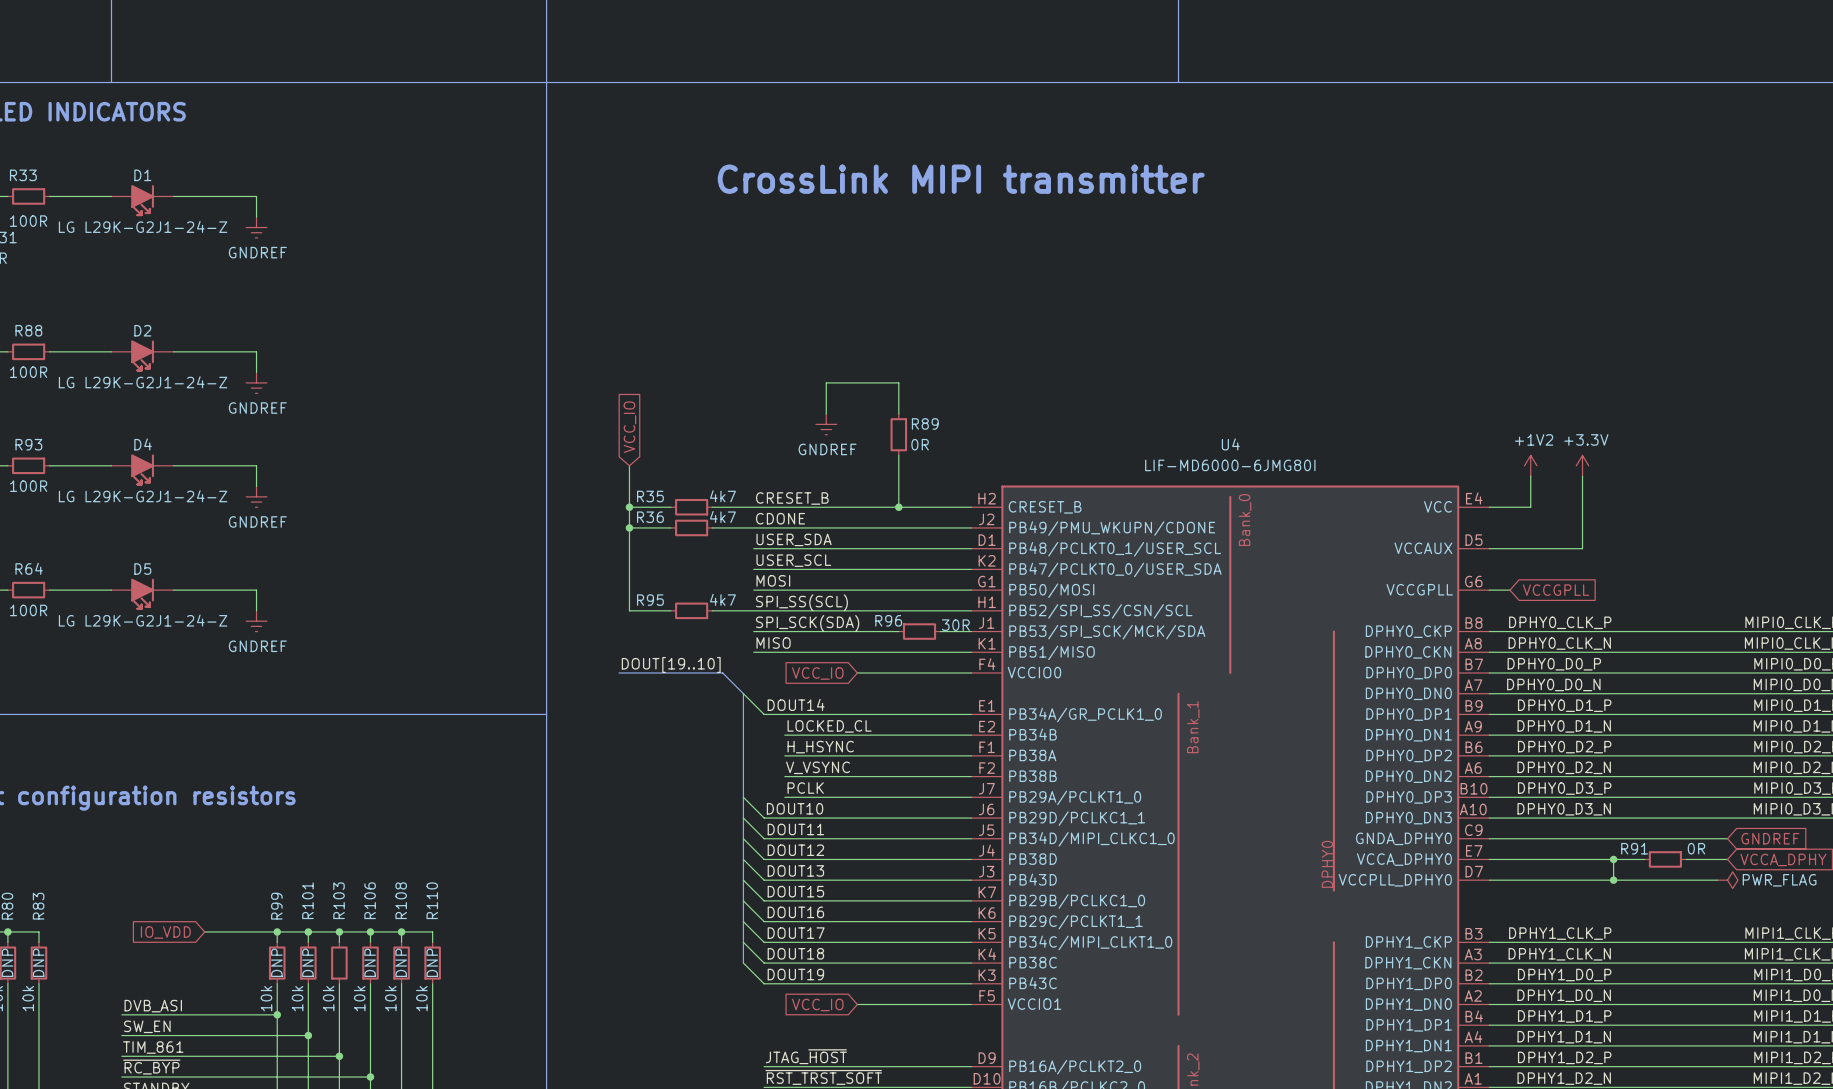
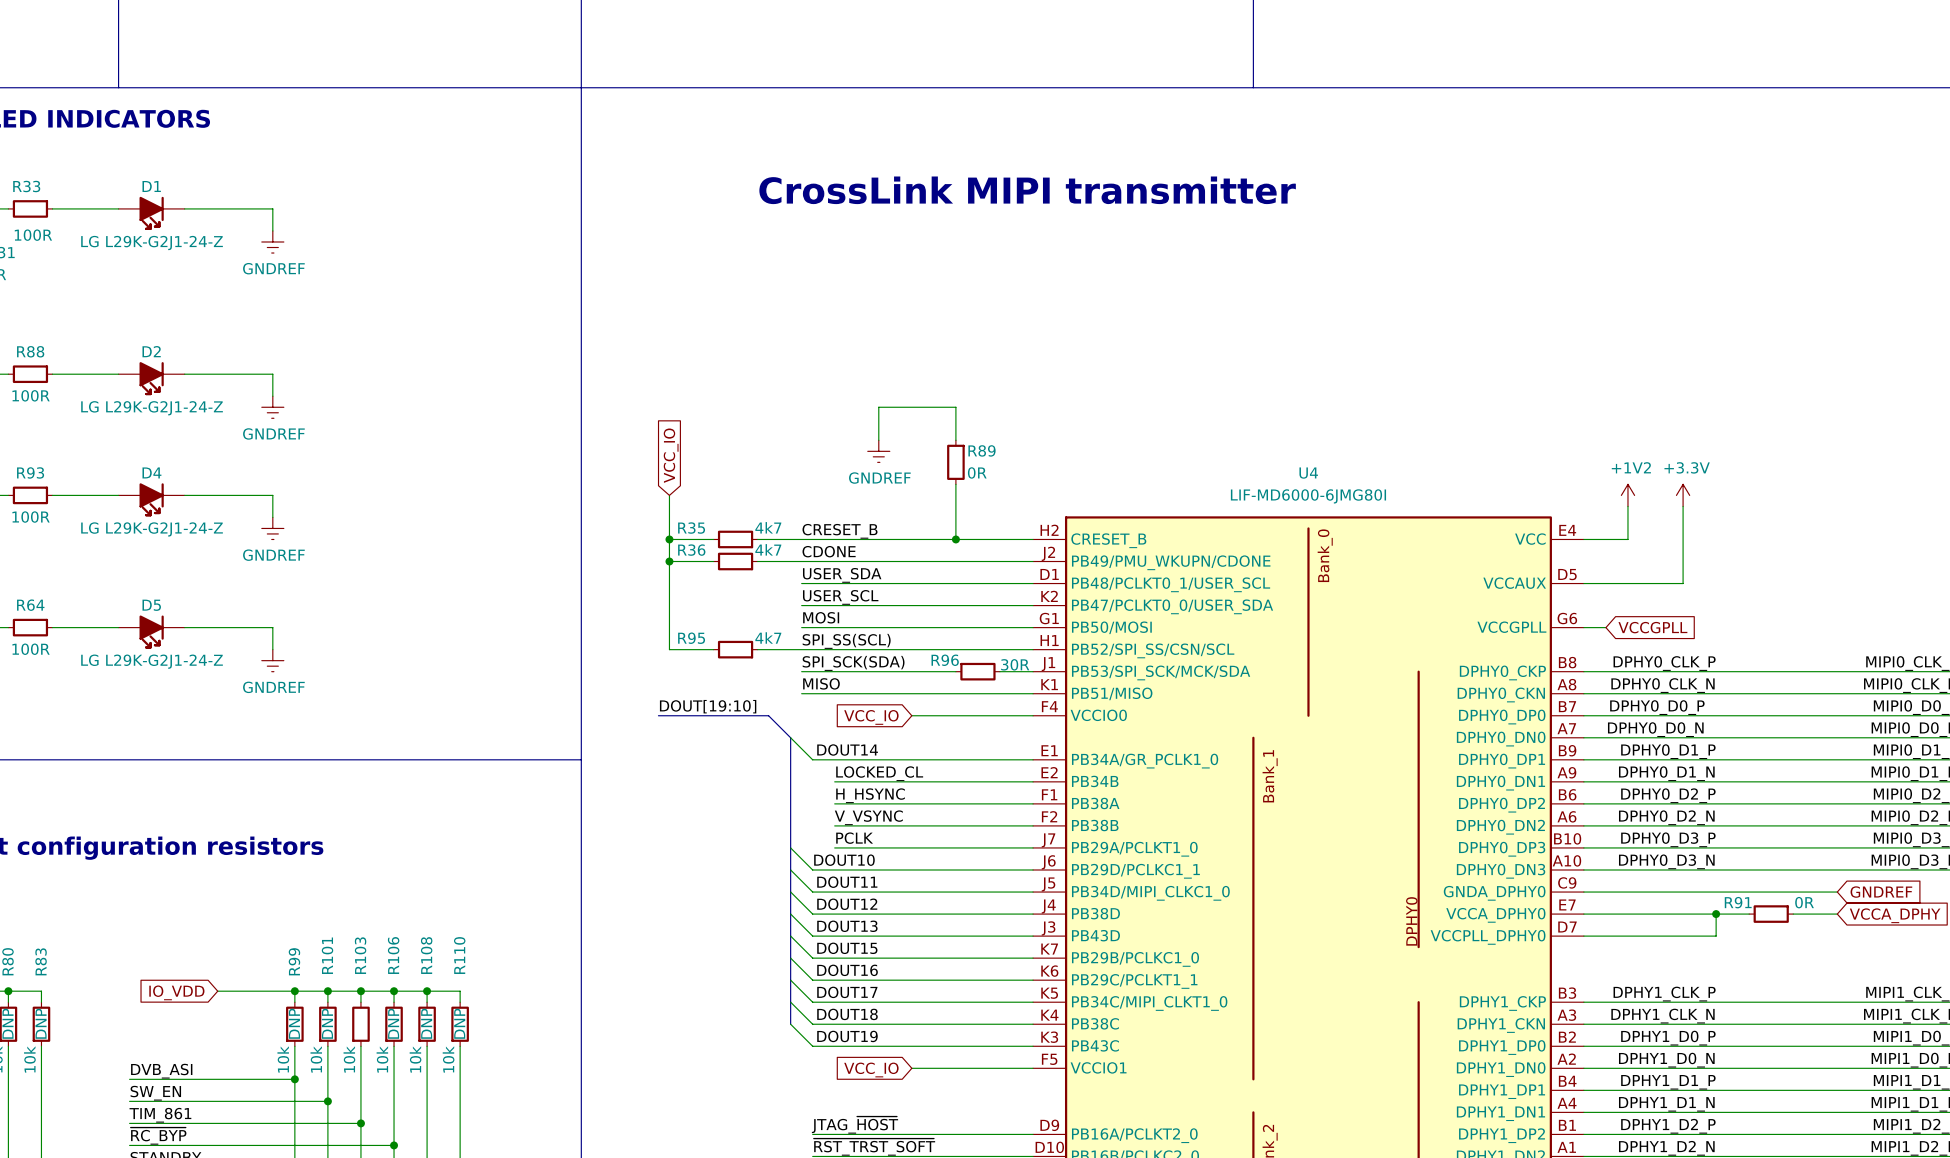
label: DOUT[19..10] (671, 664) -> DOUT[19:10] (708, 706)
wire: (1613, 880) (1717, 880) -> none
junction: (1613, 880) -> none
power symbol: PWR_FLAG (1727, 880) -> none

